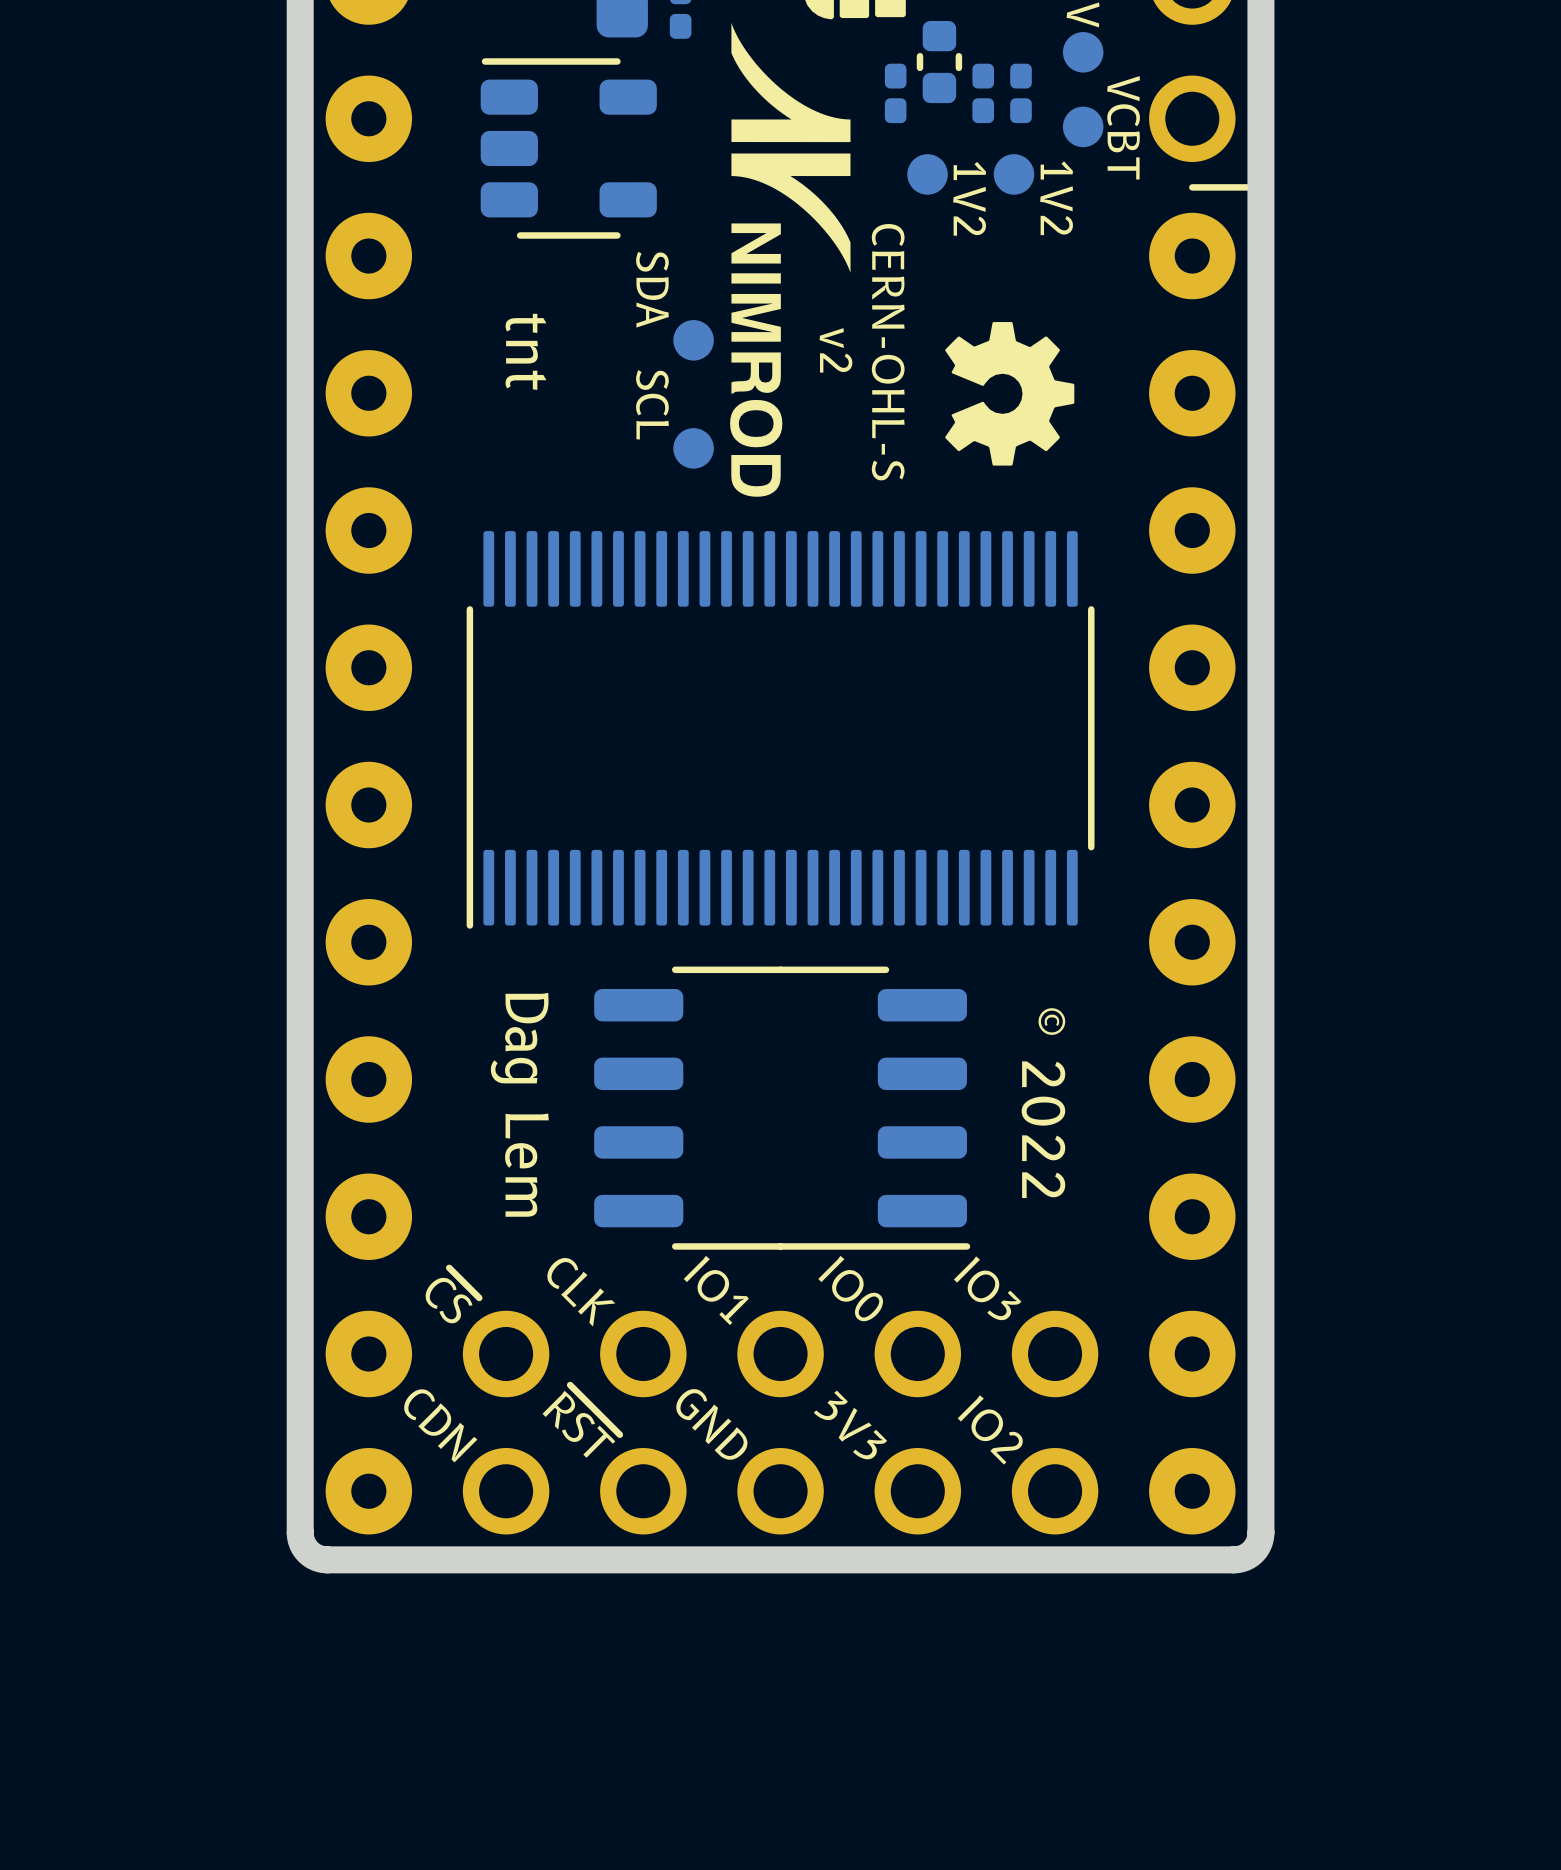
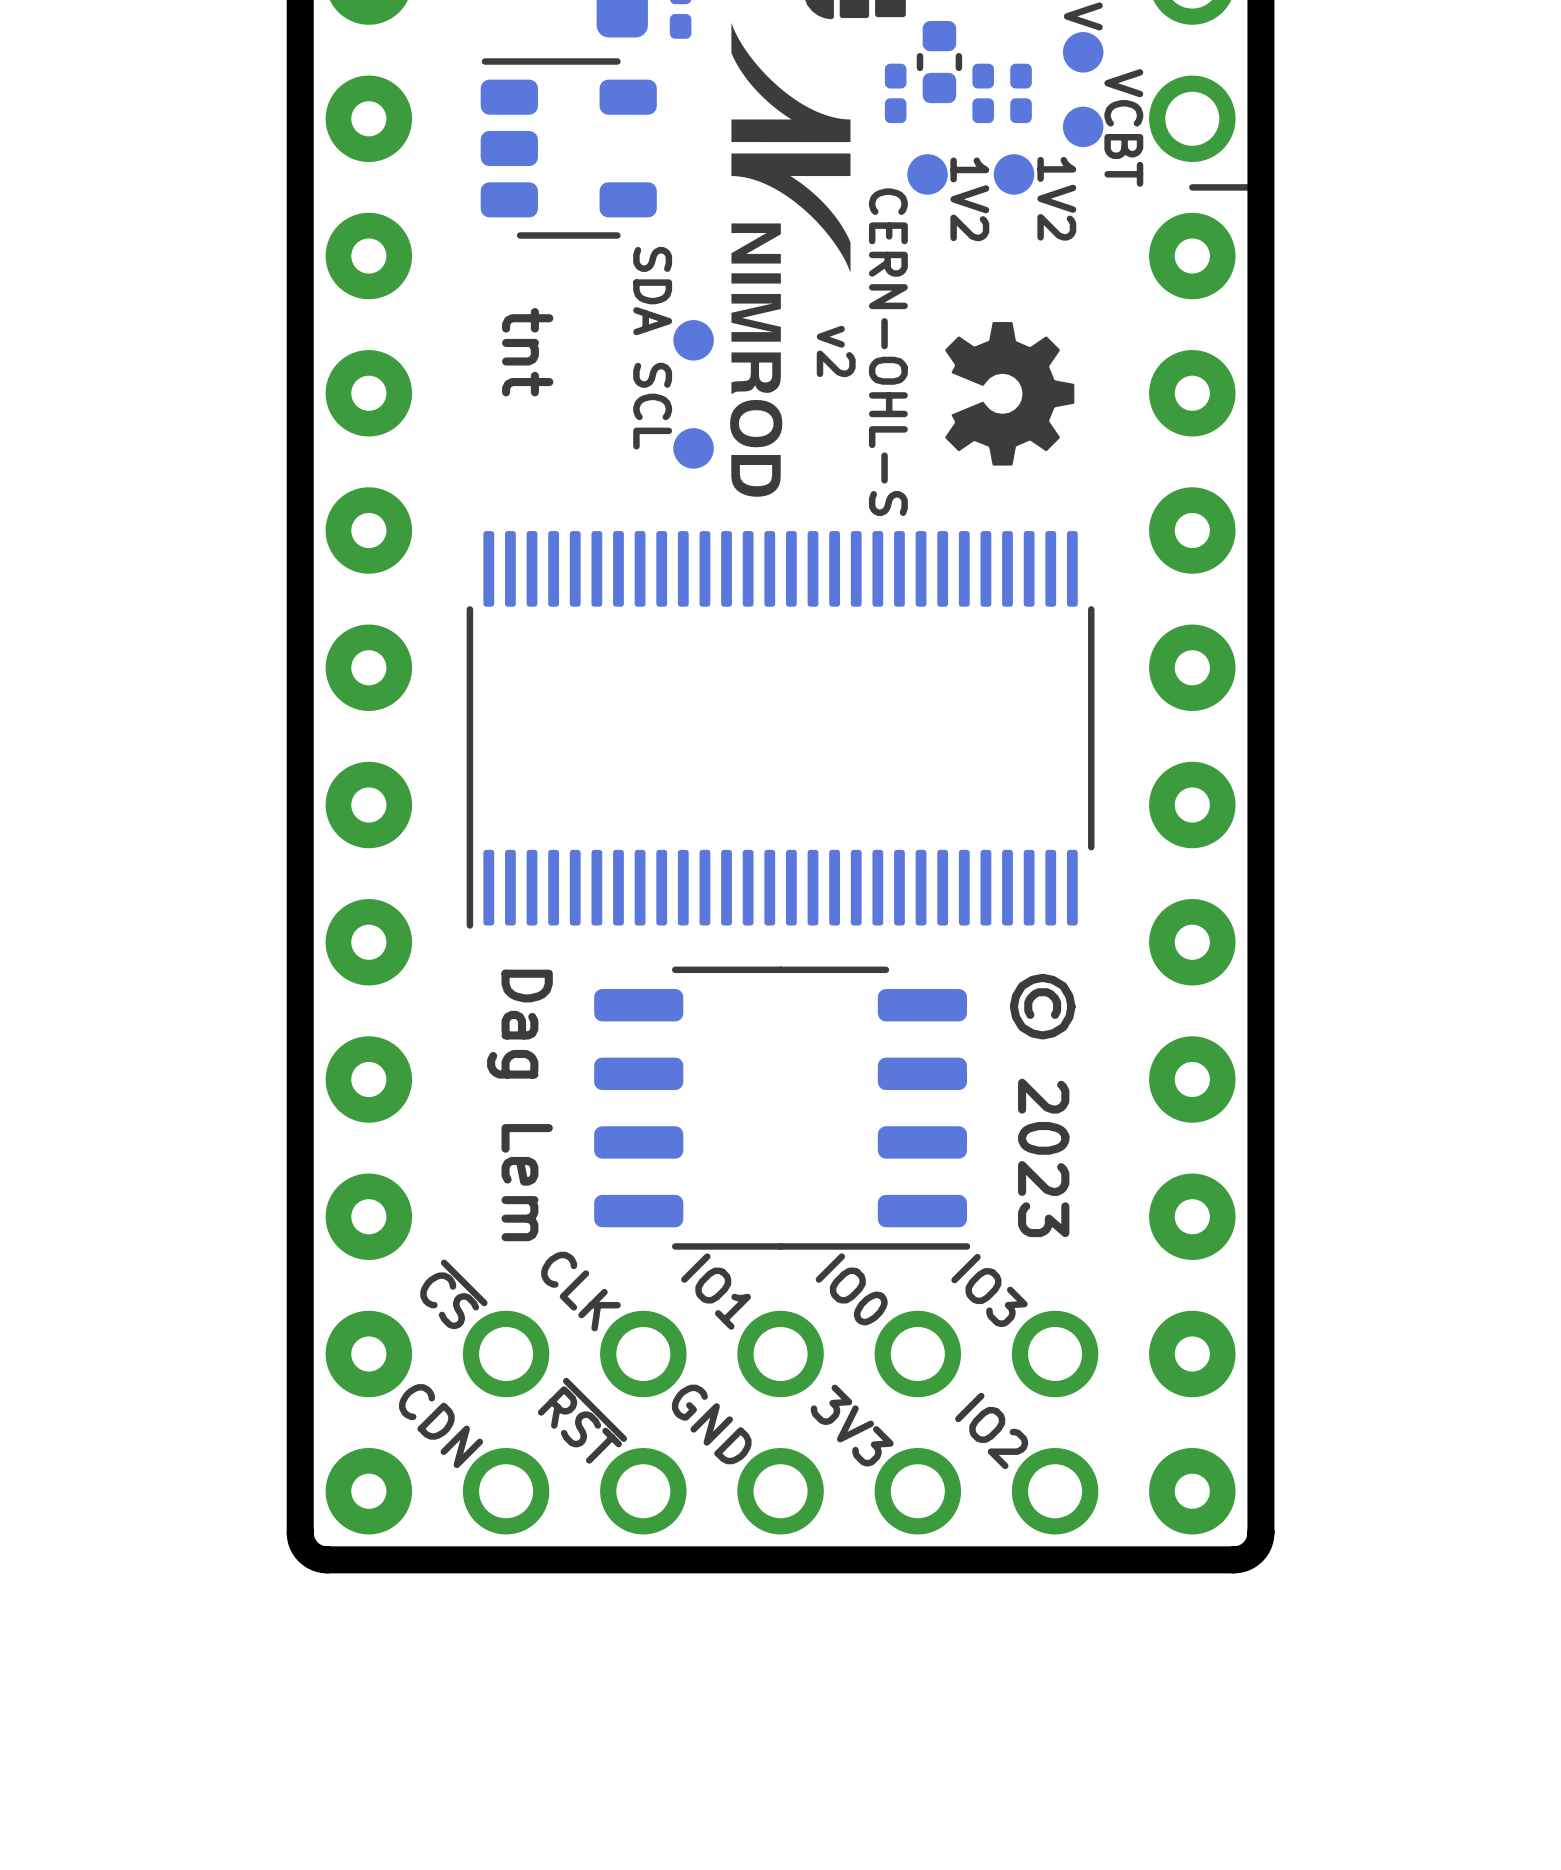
text: © 2022 (1043, 1103) -> © 2023 (1042, 1105)

